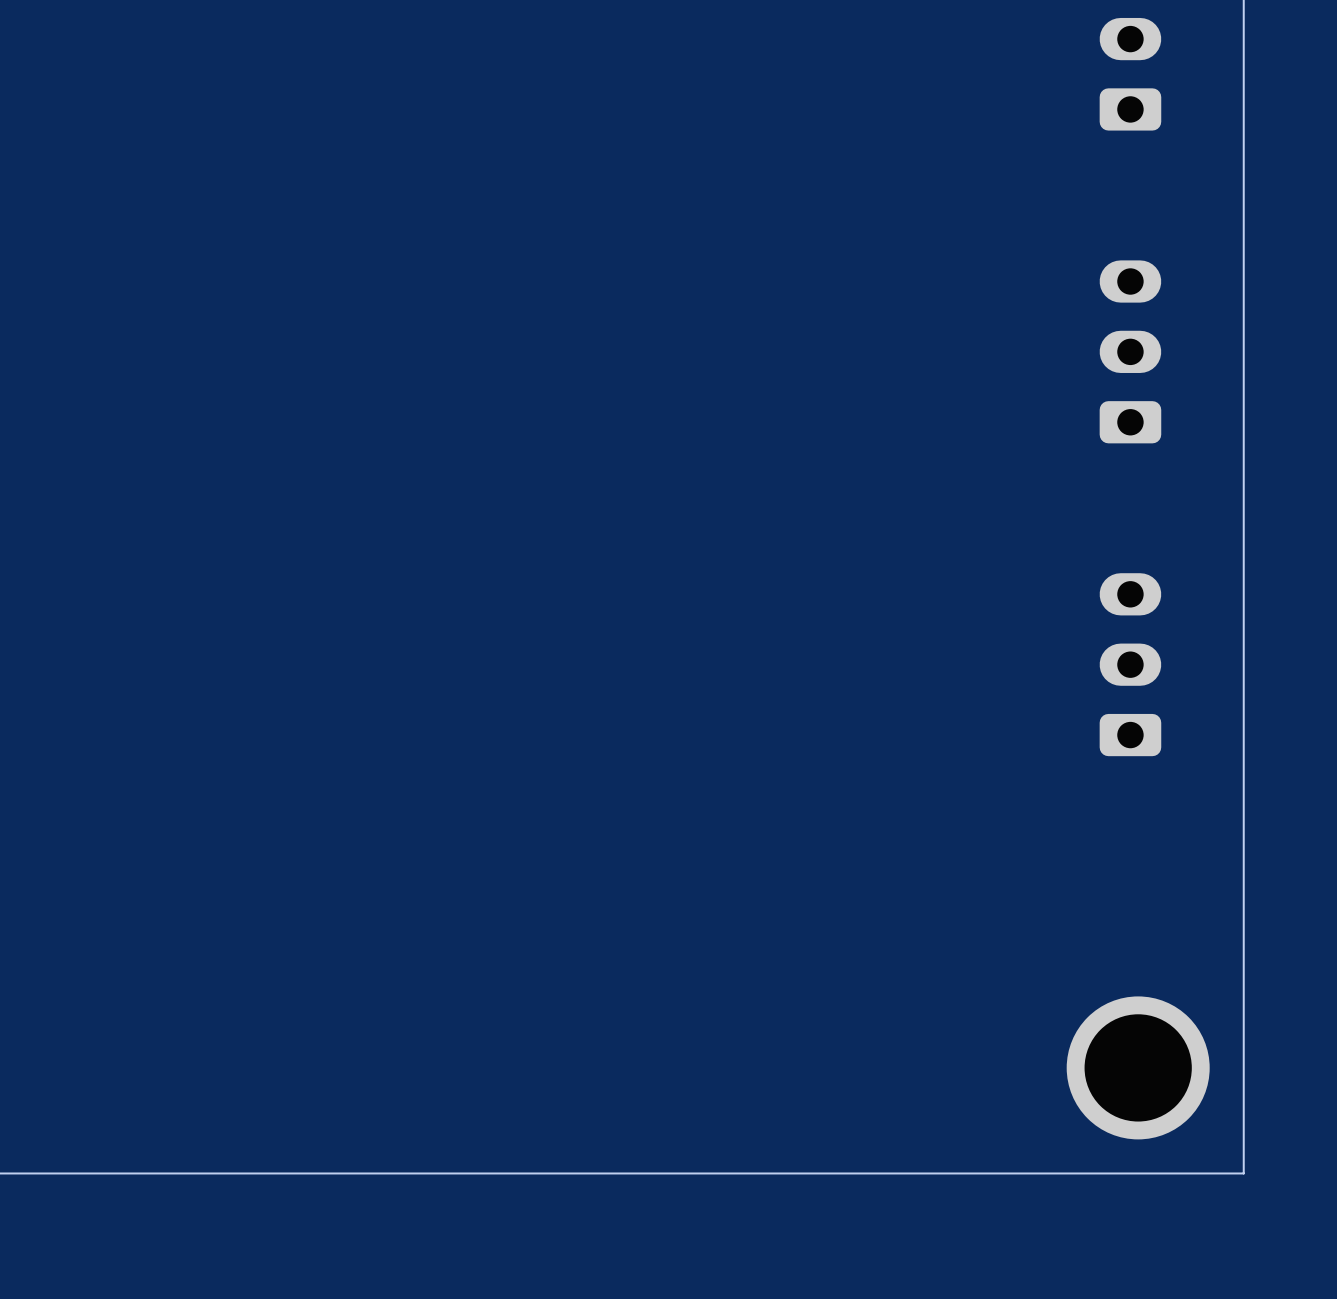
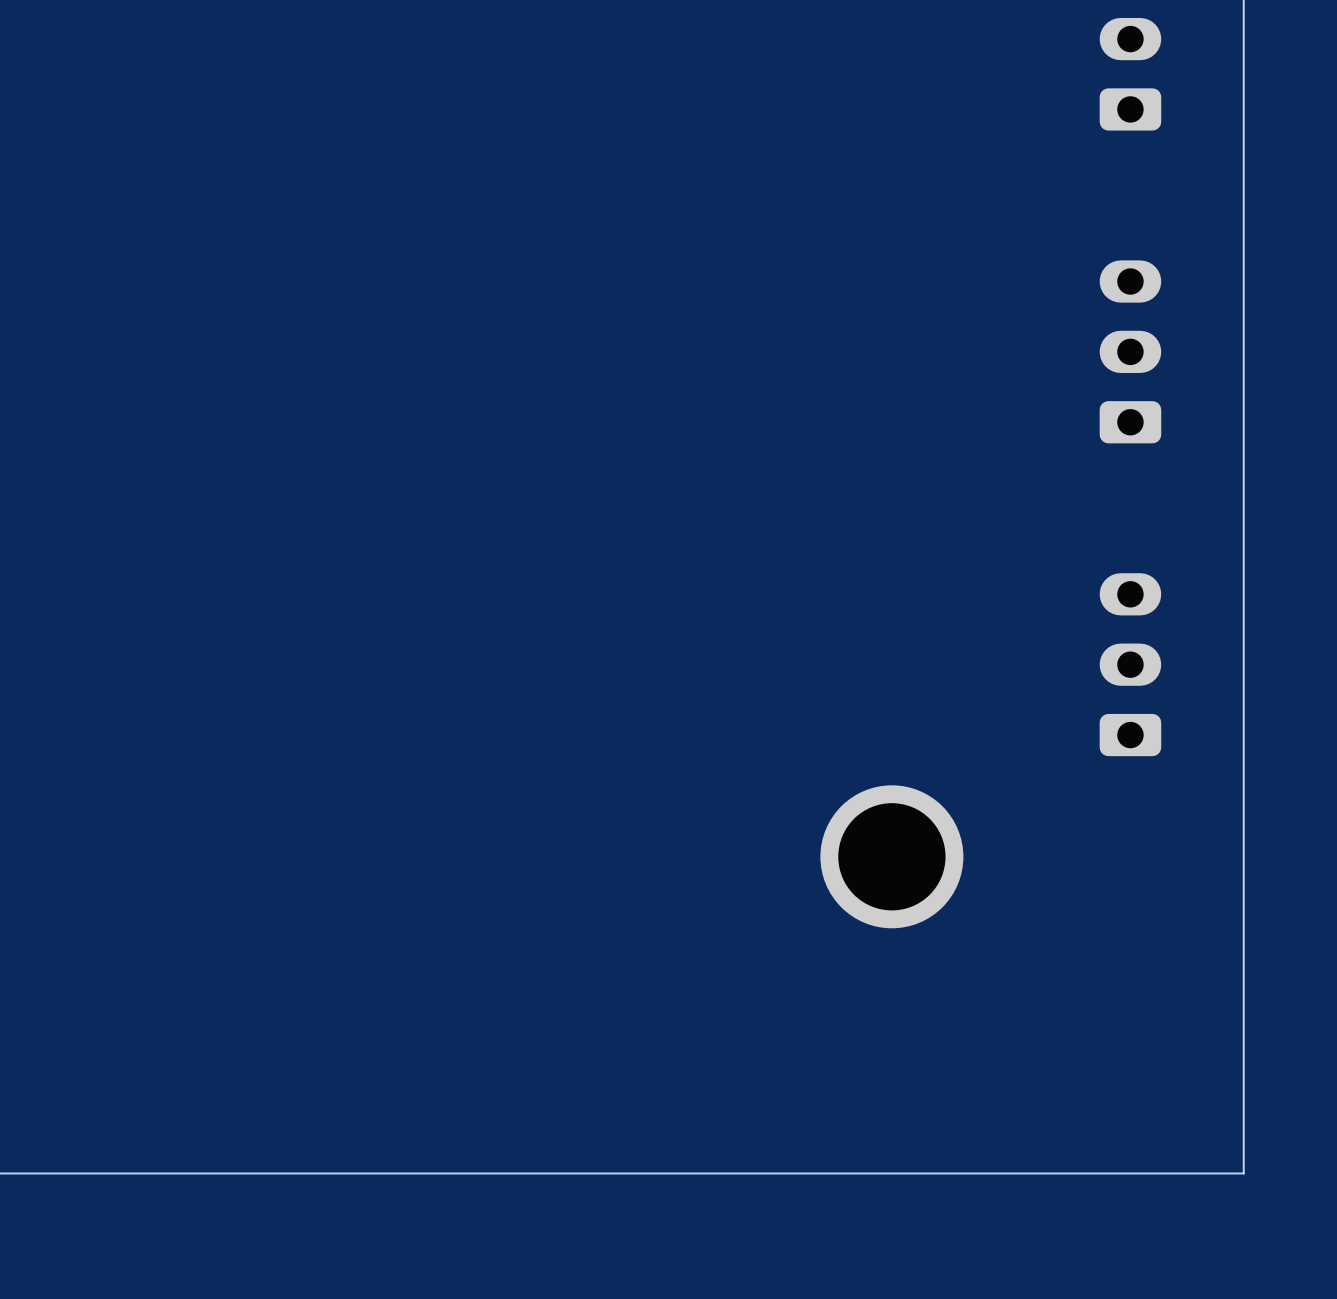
part position: (1138, 1067) -> (891, 856)

